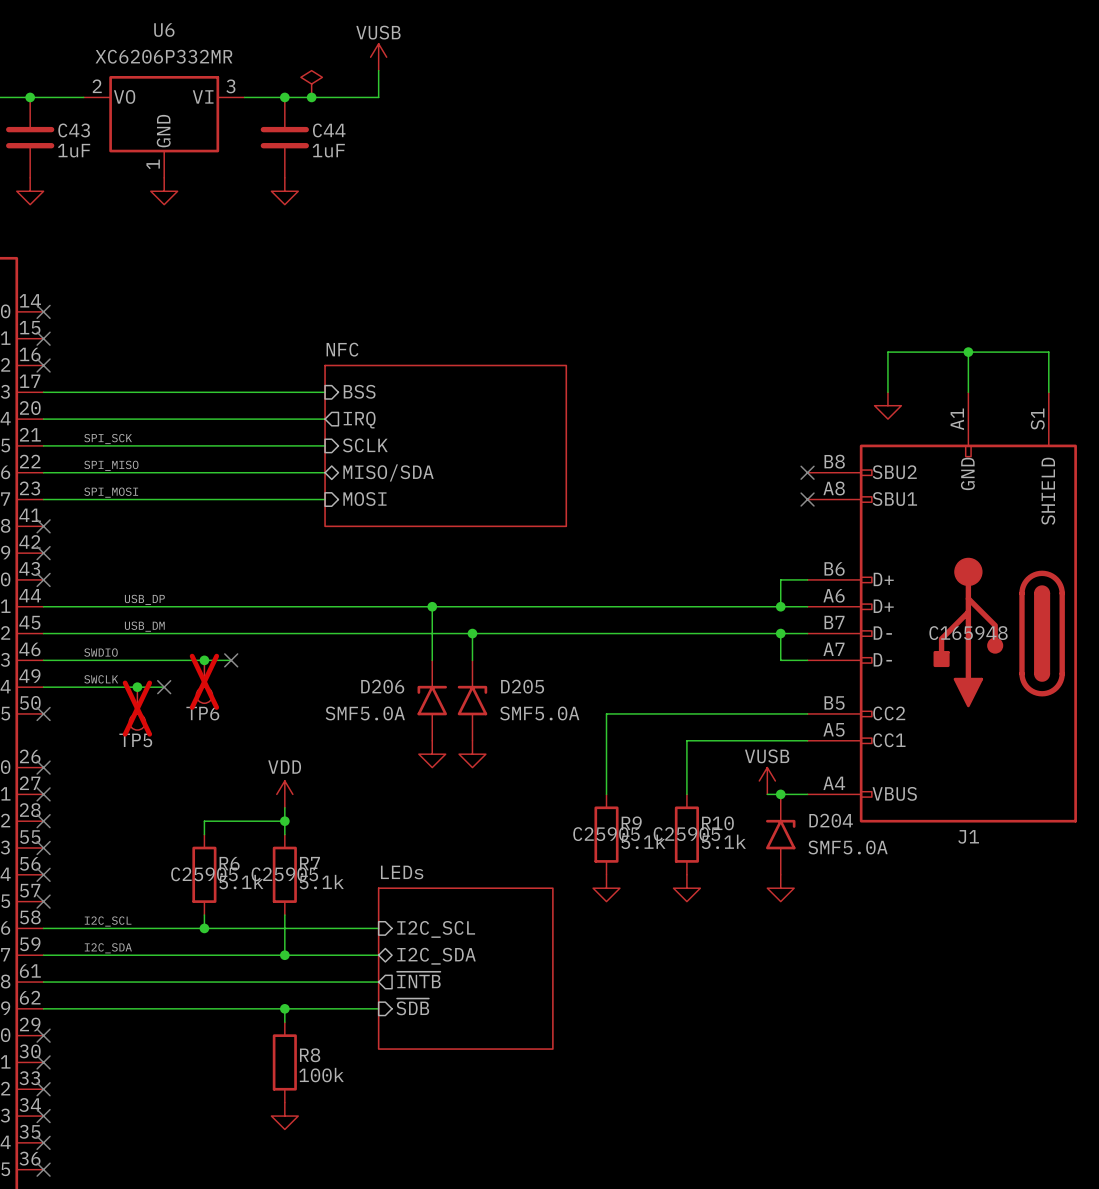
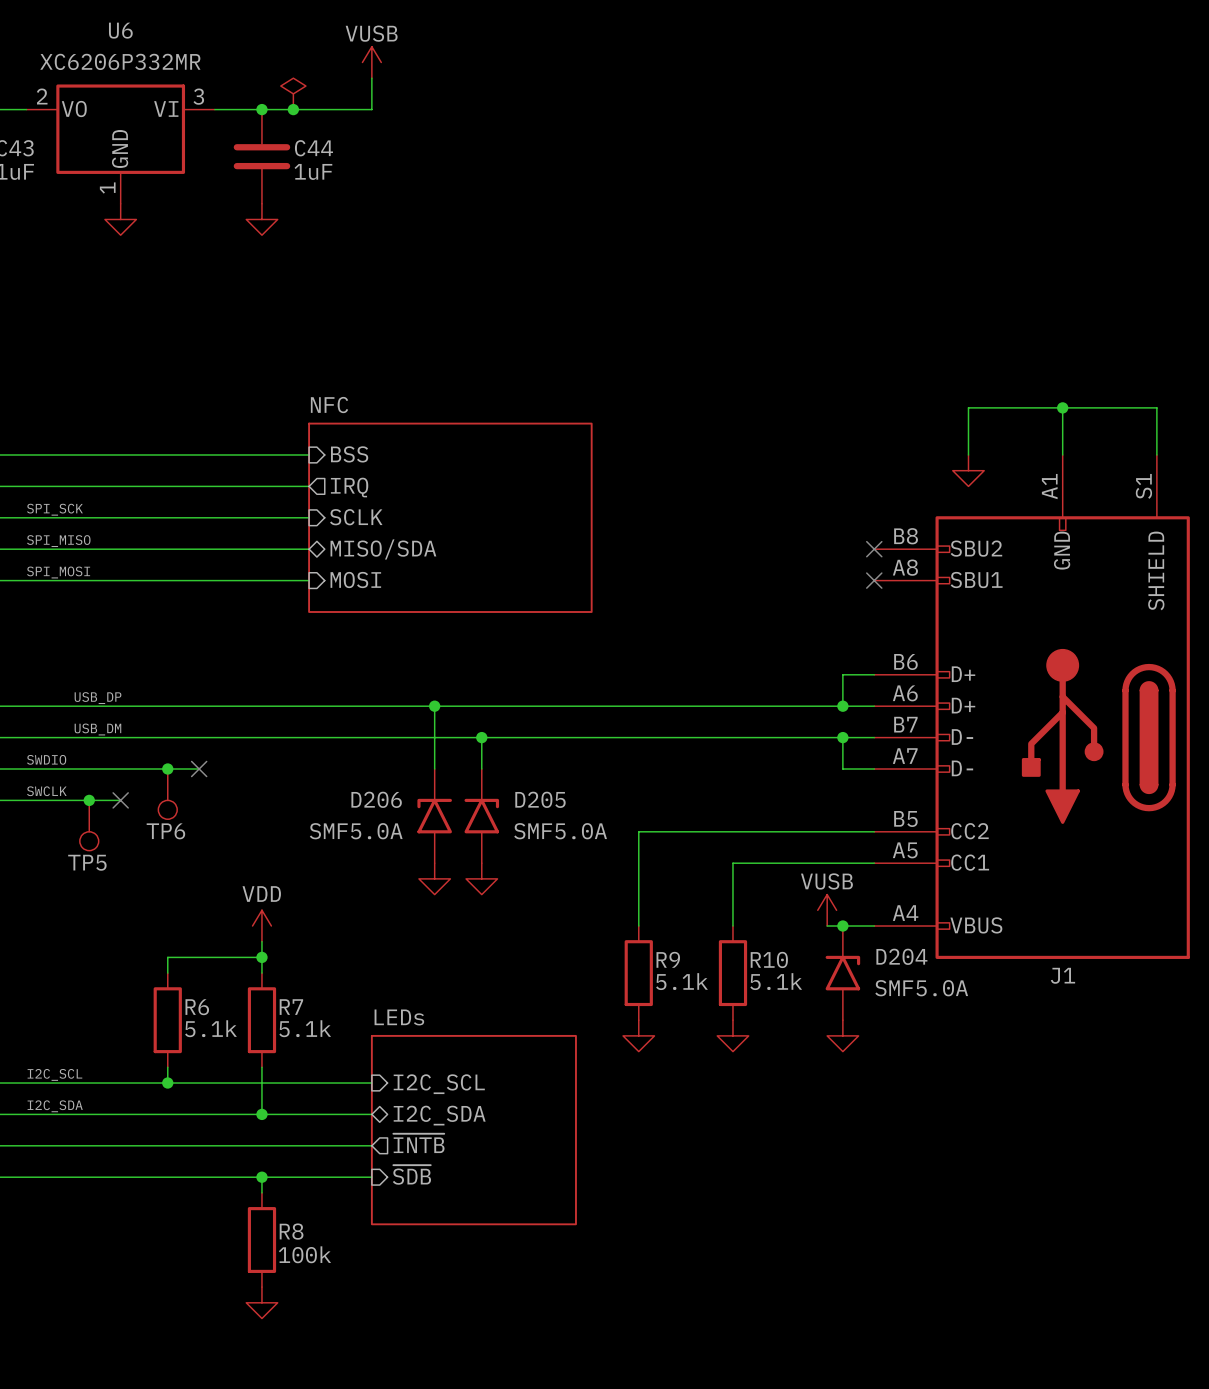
J1 text: C165948 (968, 633) -> none
TP6 do-not-place cross: (204, 681) -> none
TP5 do-not-place cross: (137, 708) -> none
R9 text: C25905 (606, 834) -> none
R10 text: C25905 (686, 834) -> none
R6 text: C25905 (204, 874) -> none
R7 text: C25905 (284, 874) -> none

